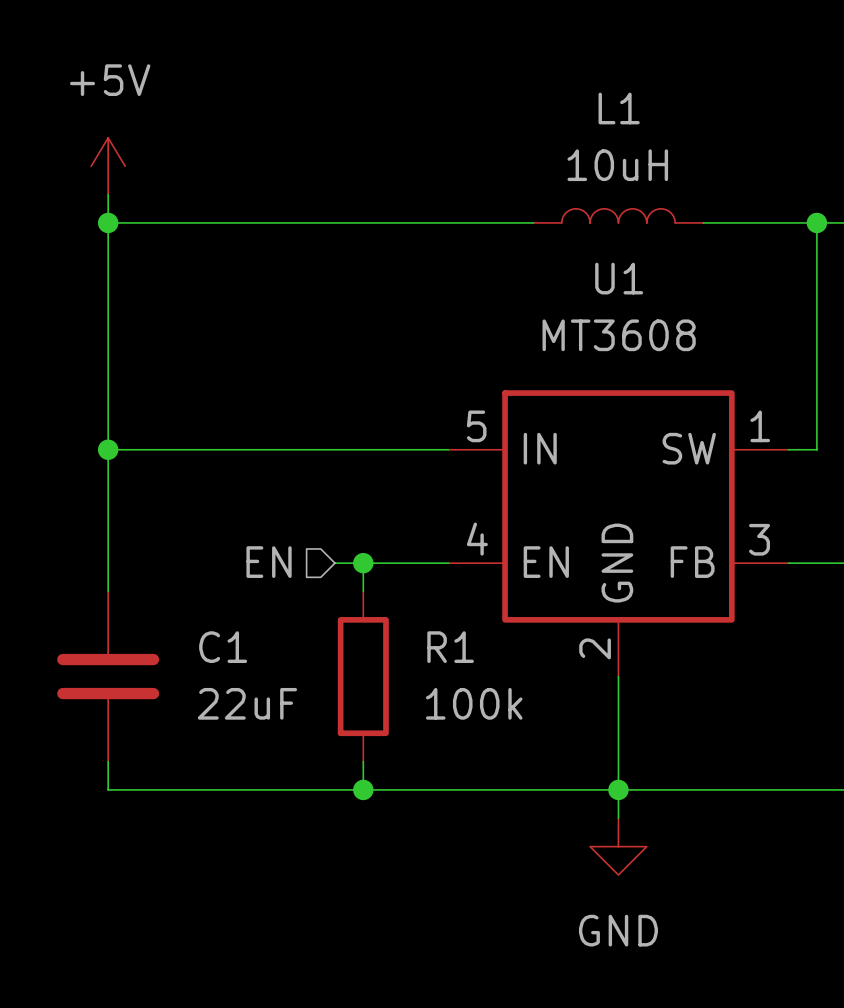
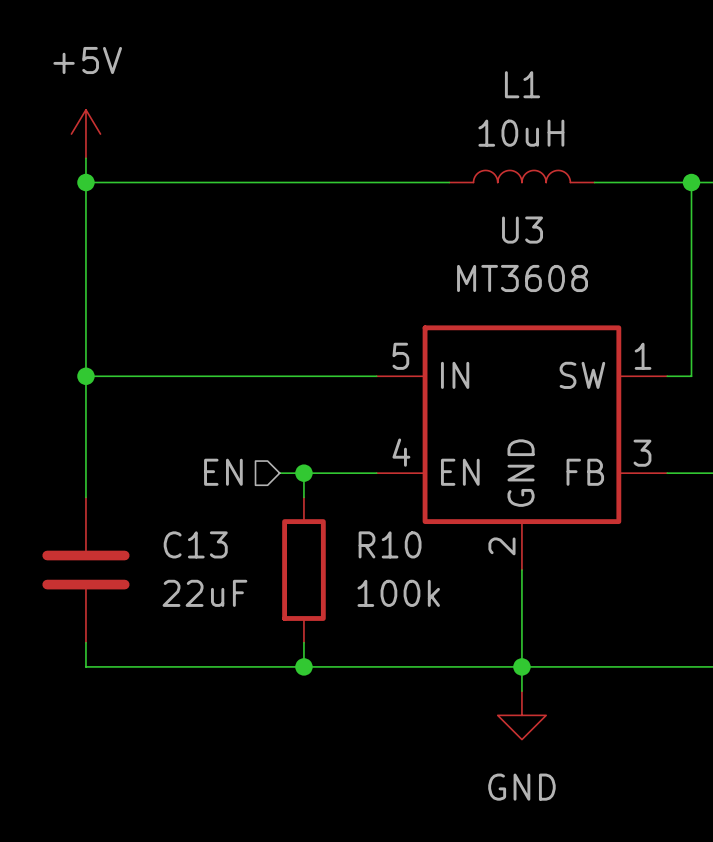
U1 name: U1 (619, 278) -> U3 (522, 230)
C1 name: C1 (223, 647) -> C13 (195, 544)
R1 name: R1 (450, 647) -> R10 (390, 544)

